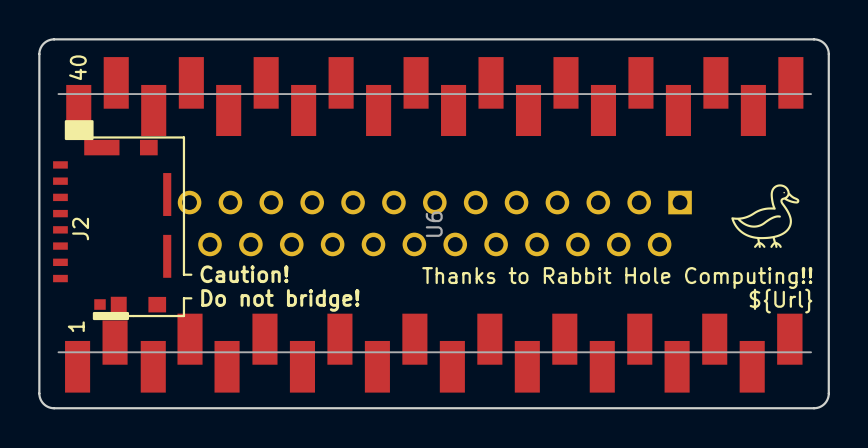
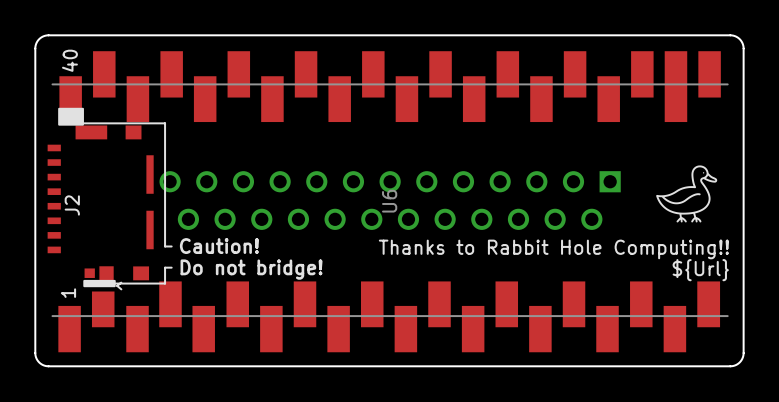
U6 footprint: [57, 57, 812, 393] -> [51, 51, 729, 353]
line: none -> (121, 282) (117, 285) (121, 289)

